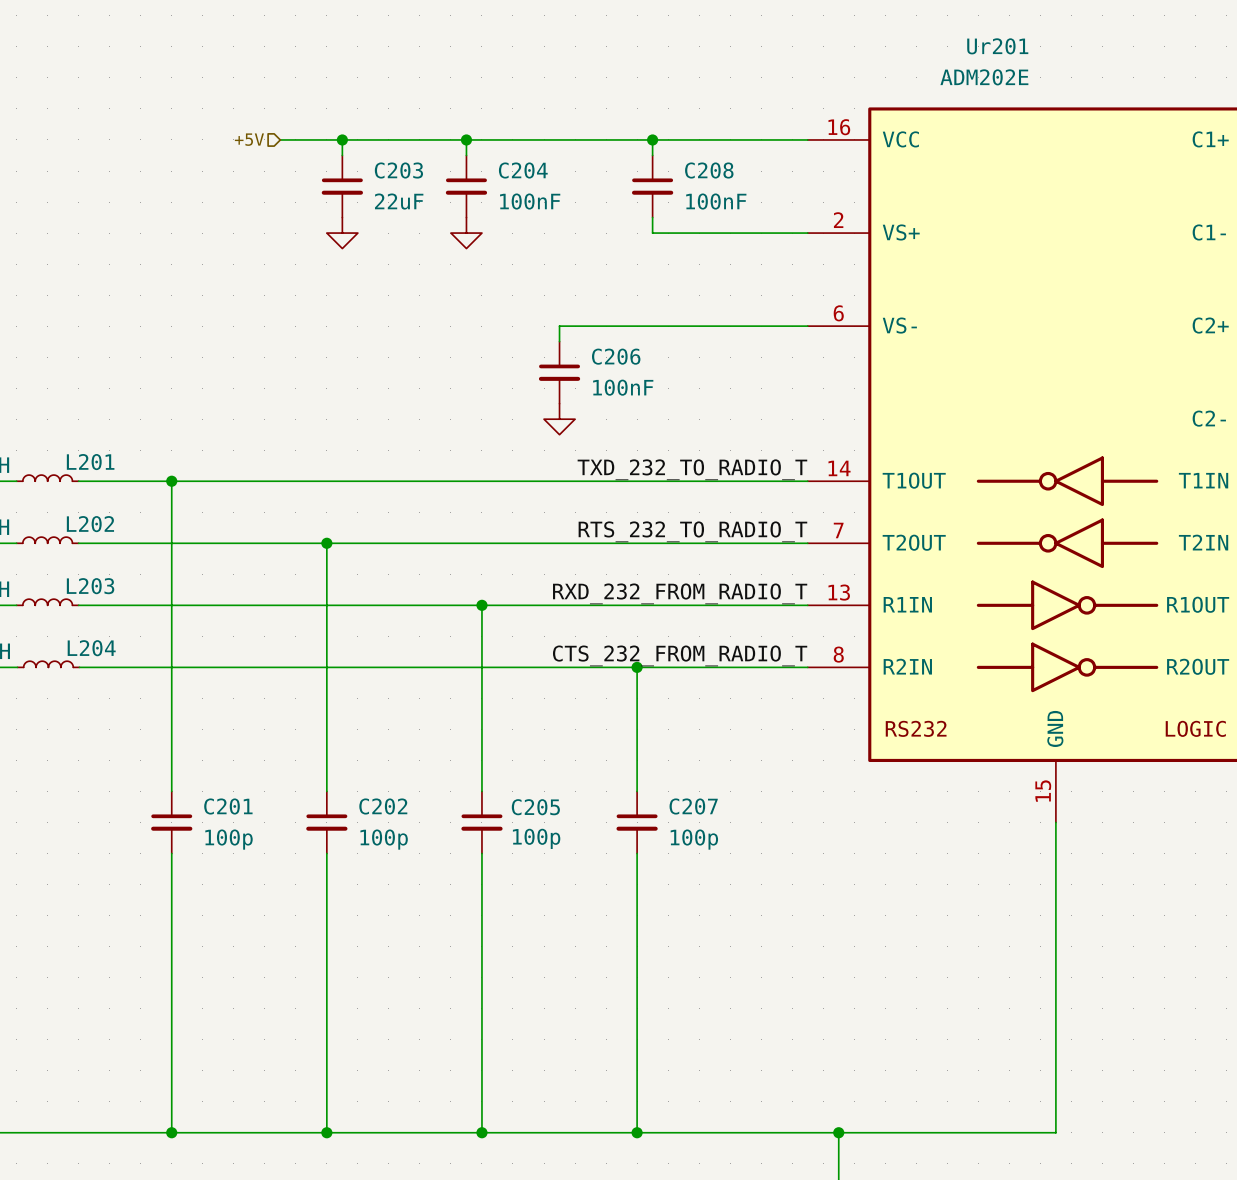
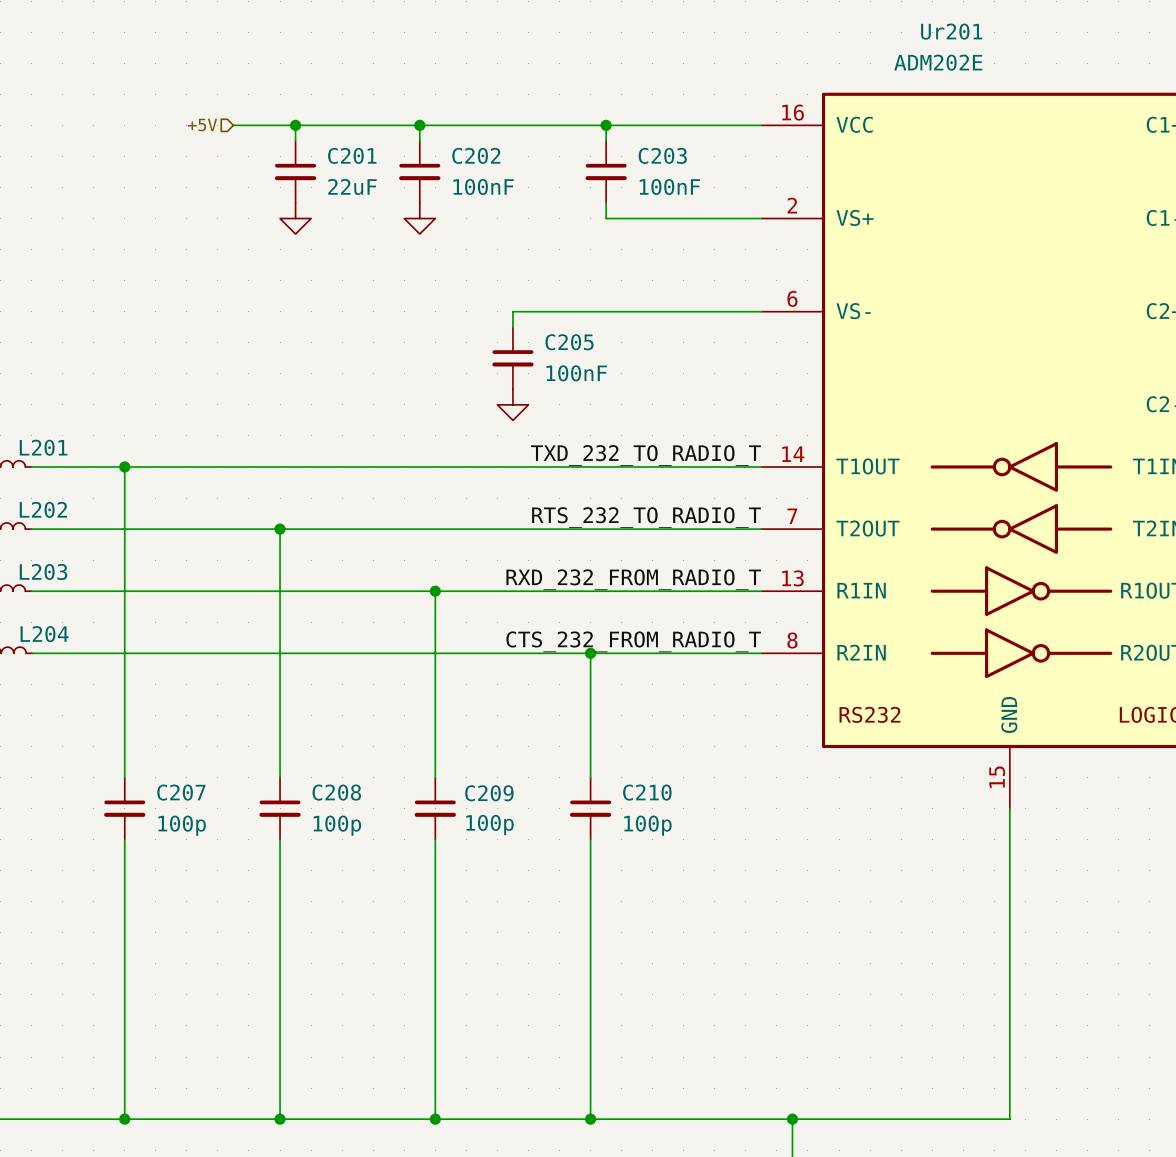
C203 name: C203 (398, 170) -> C201 (352, 155)
C204 name: C204 (523, 170) -> C202 (476, 155)
C208 name: C208 (709, 170) -> C203 (662, 155)
C206 name: C206 (616, 356) -> C205 (569, 342)
C201 name: C201 (228, 806) -> C207 (181, 792)
C202 name: C202 (383, 806) -> C208 (336, 792)
C207 name: C207 (693, 806) -> C210 (647, 792)
C205 name: C205 (535, 807) -> C209 (489, 793)

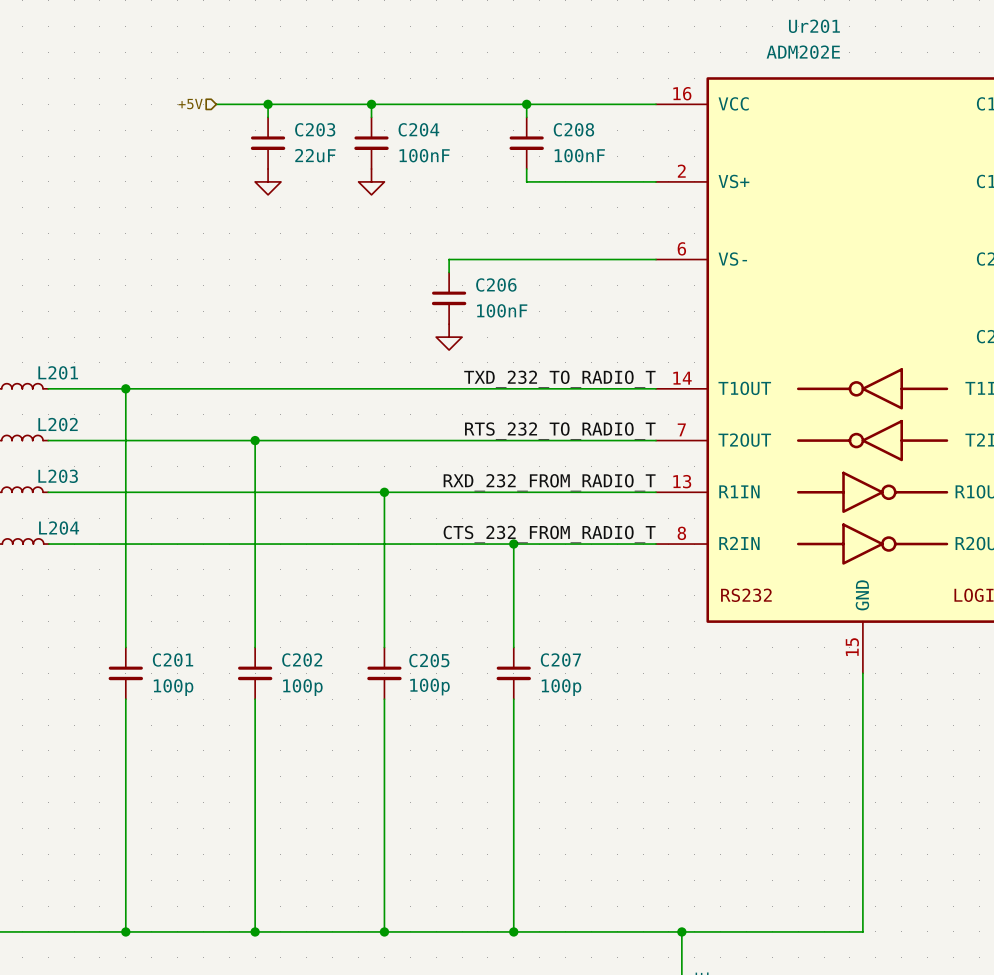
C201 name: C201 (352, 155) -> C203 (315, 129)
C202 name: C202 (476, 155) -> C204 (418, 129)
C203 name: C203 (662, 155) -> C208 (573, 129)
C205 name: C205 (569, 342) -> C206 (496, 284)
C207 name: C207 (181, 792) -> C201 (173, 659)
C208 name: C208 (336, 792) -> C202 (302, 659)
C210 name: C210 (647, 792) -> C207 (560, 659)
C209 name: C209 (489, 793) -> C205 (429, 660)

